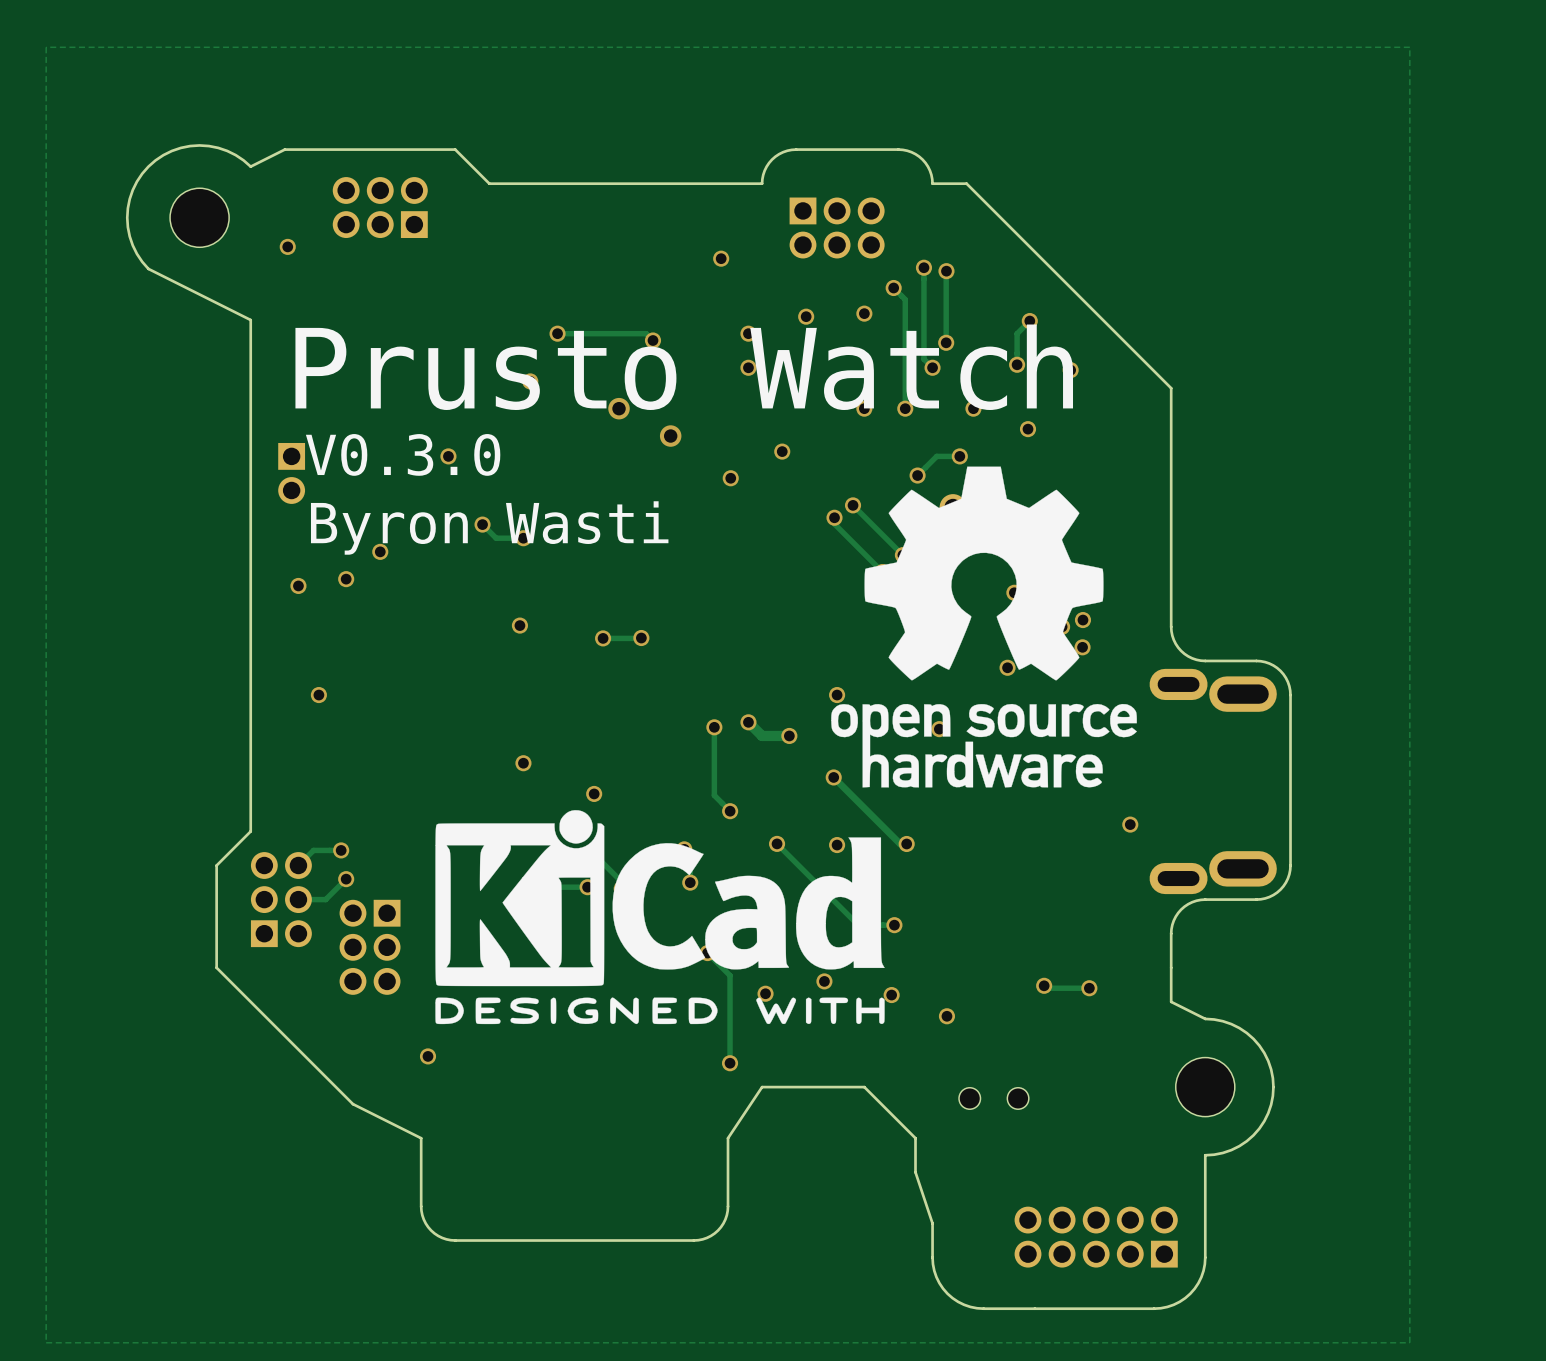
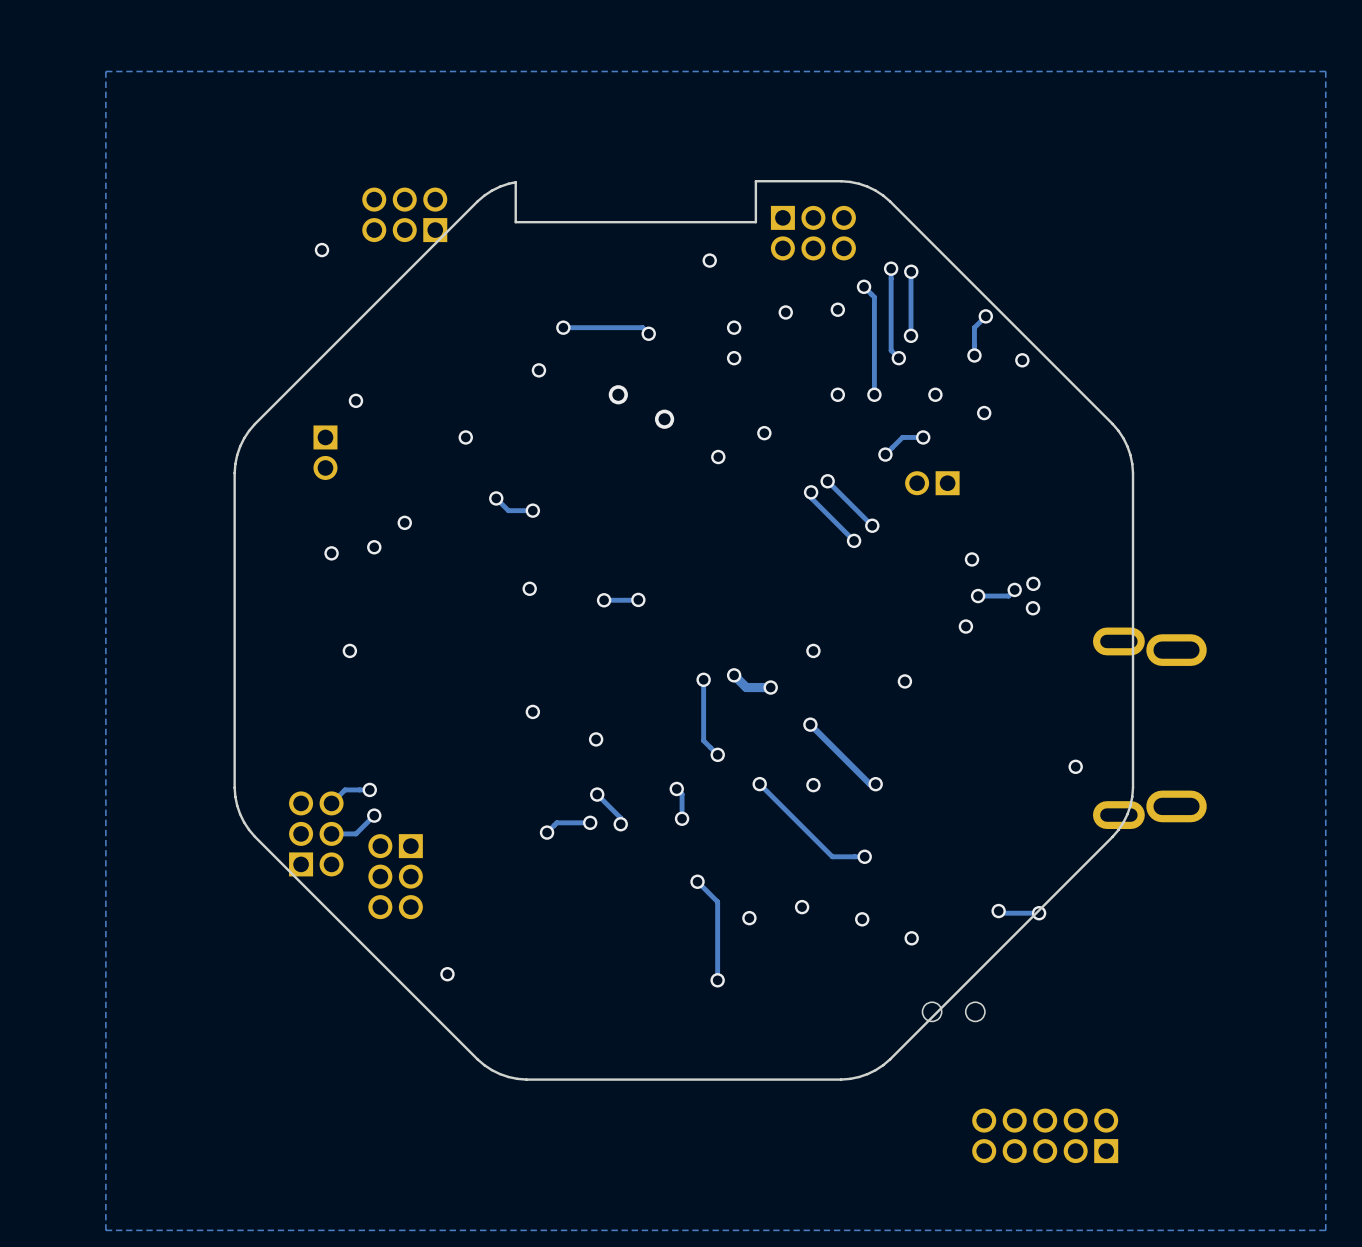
board edge: (898, 149) (787, 150) (779, 154) (769, 162) (763, 174) (762, 183) (489, 183) (455, 149) (284, 149) (250, 166) (227, 150) (199, 145) (180, 147) (163, 155) (142, 173) (132, 190) (127, 217) (132, 245) (142, 261) (148, 268) (250, 320) (250, 831) (216, 865) (216, 967) (352, 1104) (421, 1138) (422, 1215) (431, 1230) (442, 1237) (455, 1240) (693, 1240) (706, 1237) (718, 1230) (726, 1215) (728, 1138) (762, 1087) (864, 1087) (915, 1138) (915, 1172) (932, 1223) (934, 1270) (939, 1283) (952, 1298) (970, 1306) (983, 1308) (1154, 1308) (1167, 1306) (1179, 1301) (1190, 1293) (1198, 1283) (1203, 1270) (1205, 1257) (1205, 1155) (1231, 1150) (1253, 1135) (1268, 1113) (1273, 1087) (1268, 1061) (1259, 1045) (1246, 1033) (1222, 1021) (1205, 1018) (1171, 1001) (1171, 929) (1178, 912) (1192, 902) (1205, 899) (1265, 898) (1277, 892) (1287, 878) (1290, 865) (1289, 686) (1283, 674) (1269, 663) (1256, 660) (1196, 659) (1184, 653) (1173, 639) (1171, 626) (1171, 388) (966, 183) (932, 183) (929, 170) (922, 159) (911, 152) (898, 149) -> (841, 181) (867, 186) (890, 201) (1112, 424) (1127, 446) (1133, 473) (1133, 787) (1127, 814) (1112, 836) (890, 1059) (867, 1074) (841, 1079) (526, 1079) (500, 1074) (477, 1059) (254, 836) (240, 814) (234, 787) (234, 473) (240, 446) (254, 424) (477, 201) (500, 186) (515, 182) (515, 222) (755, 222) (755, 181) (841, 181)
part: (199, 217) -> none
text: Prusto Watch (684, 367) -> none
via: none -> (355, 400)
text: V0.3.0 (403, 454) -> none
drawing: [435, 466, 1137, 1025] -> none
text: Byron Wasti (489, 527) -> none
part: (1205, 1087) -> none

